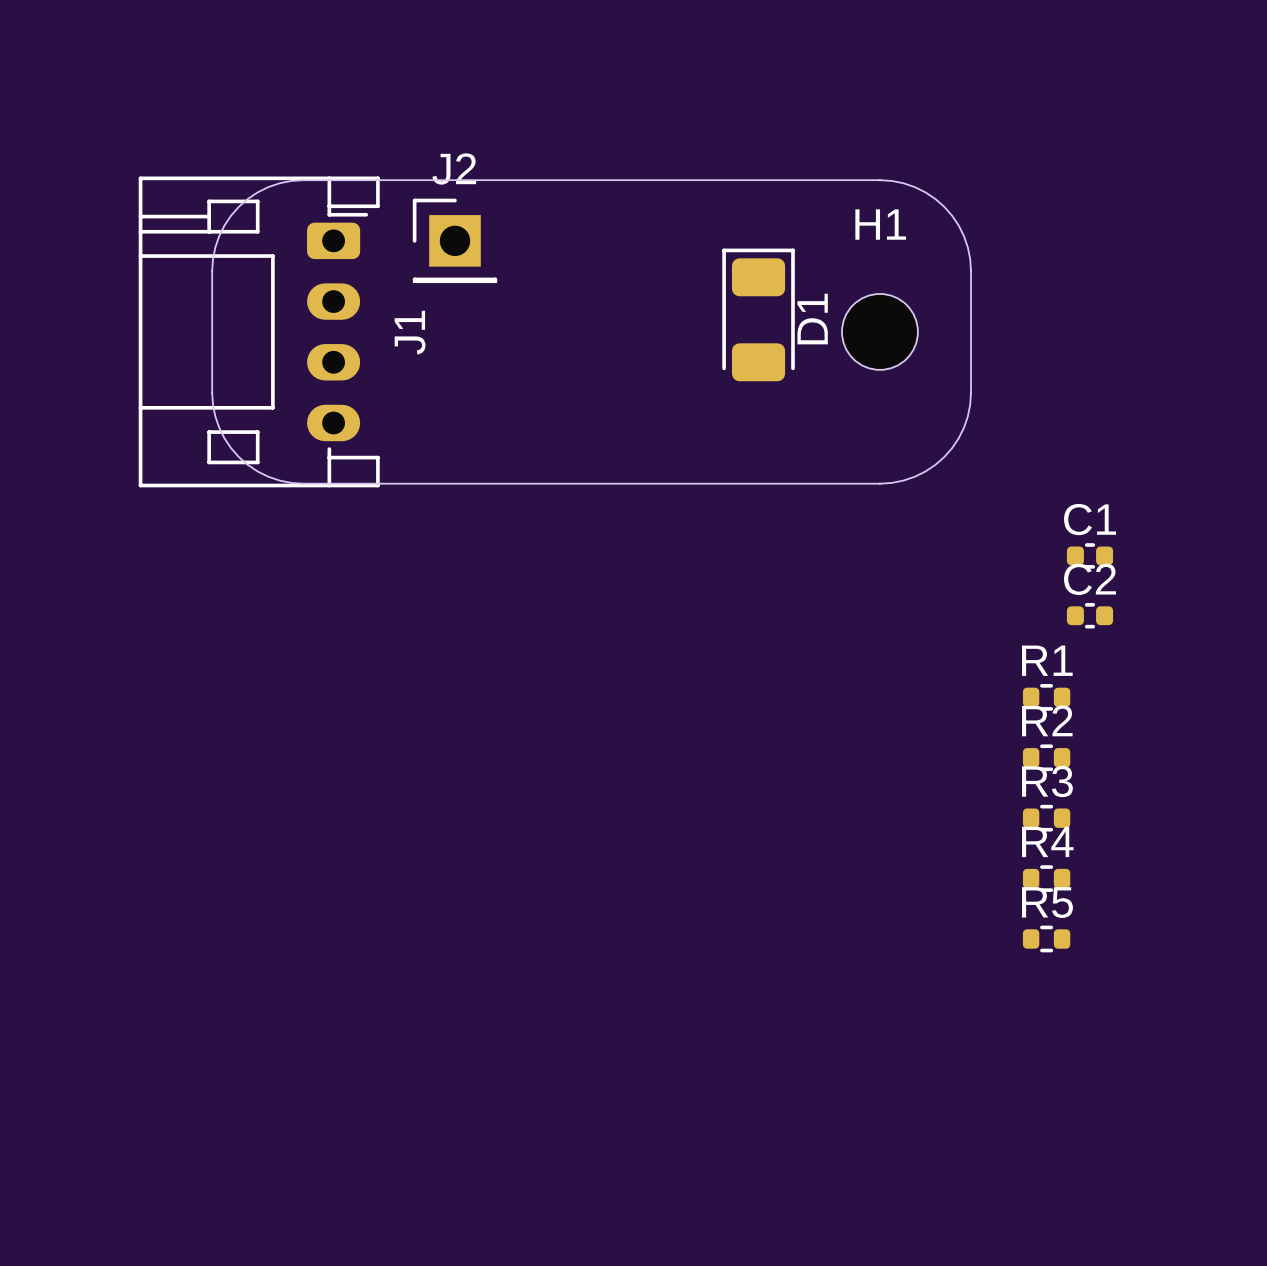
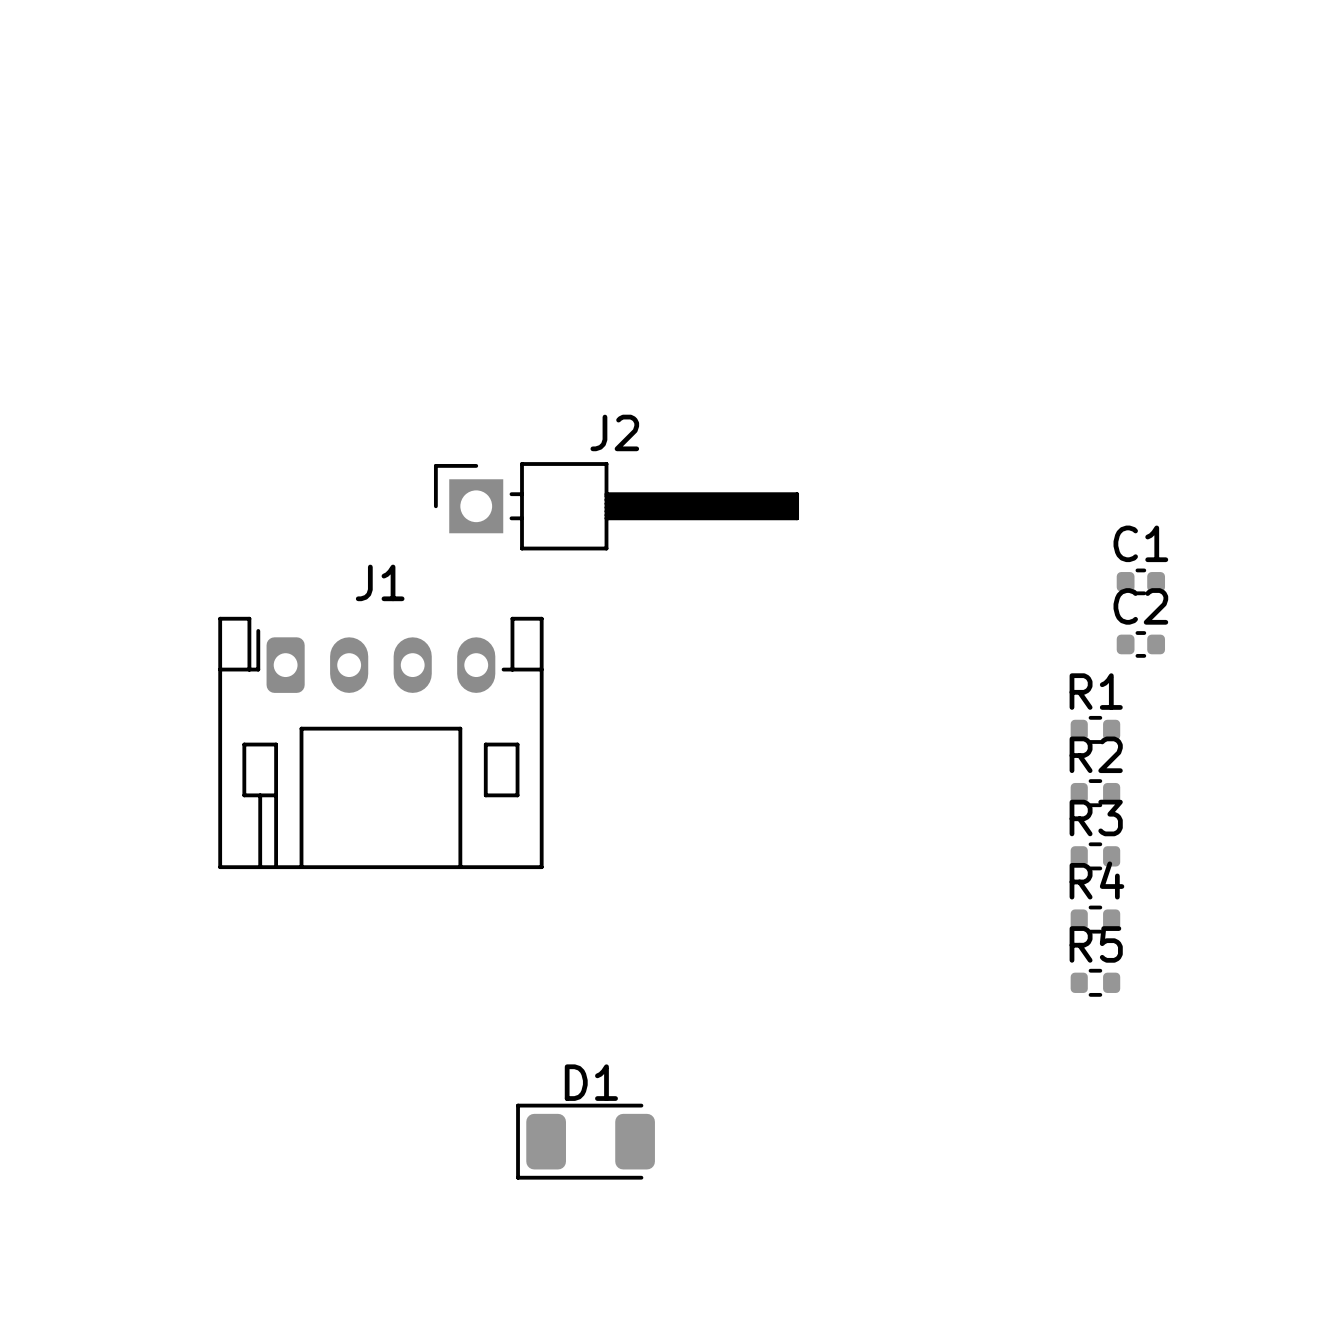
board edge: (303, 180) (879, 180) (903, 183) (914, 187) (925, 192) (944, 206) (958, 225) (967, 247) (971, 271) (971, 392) (967, 416) (964, 427) (952, 448) (935, 464) (914, 476) (891, 482) (303, 483) (291, 482) (268, 476) (247, 464) (231, 448) (224, 438) (215, 416) (212, 392) (212, 259) (215, 247) (224, 225) (238, 206) (247, 198) (257, 192) (279, 183) (303, 180) -> none
J2 footprint: [412, 198, 498, 284] -> [433, 462, 800, 551]
D1 rotation: 0° (758, 314) -> 90° counterclockwise (585, 1141)
D1 position: (758, 314) -> (585, 1141)
J1 rotation: 0° (259, 331) -> 90° counterclockwise (380, 742)
J1 position: (259, 331) -> (380, 742)
H1: (879, 331) -> none

